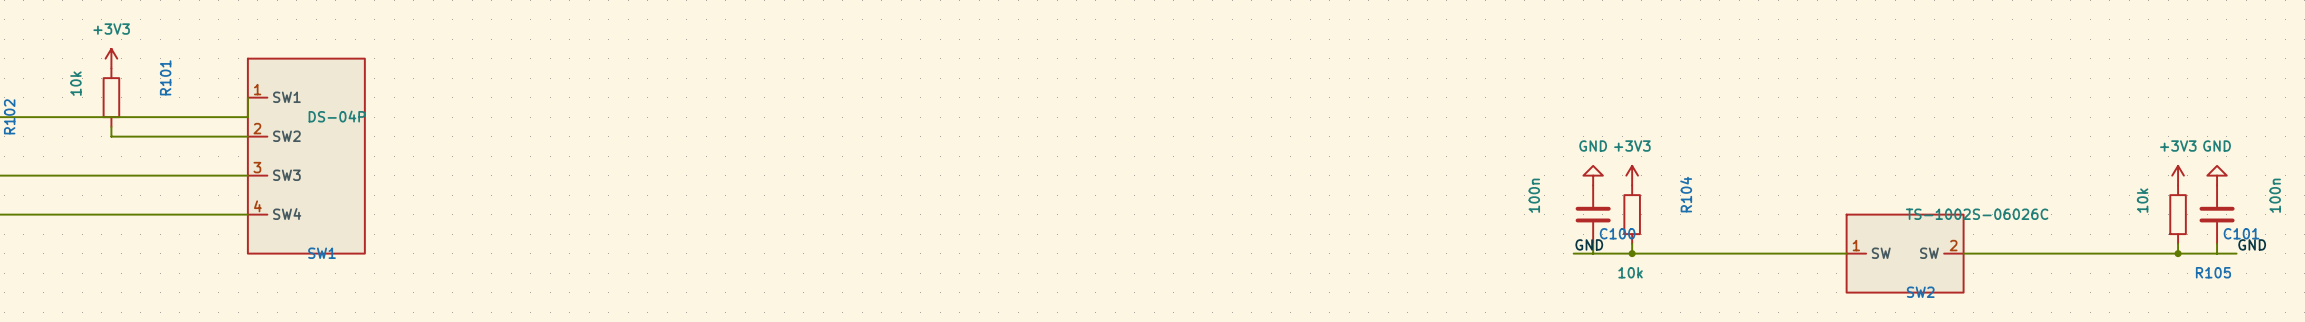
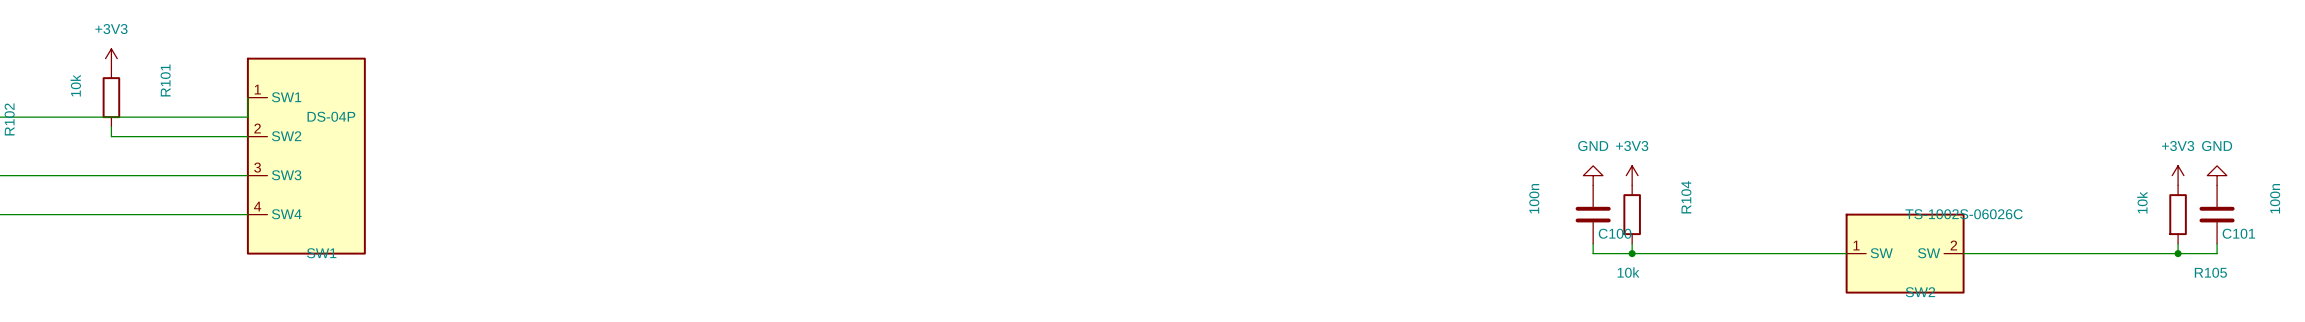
label: GND (1589, 244) -> none
label: GND (2252, 244) -> none
wire: (1573, 253) (1593, 253) -> none
wire: (2217, 253) (2236, 253) -> none

